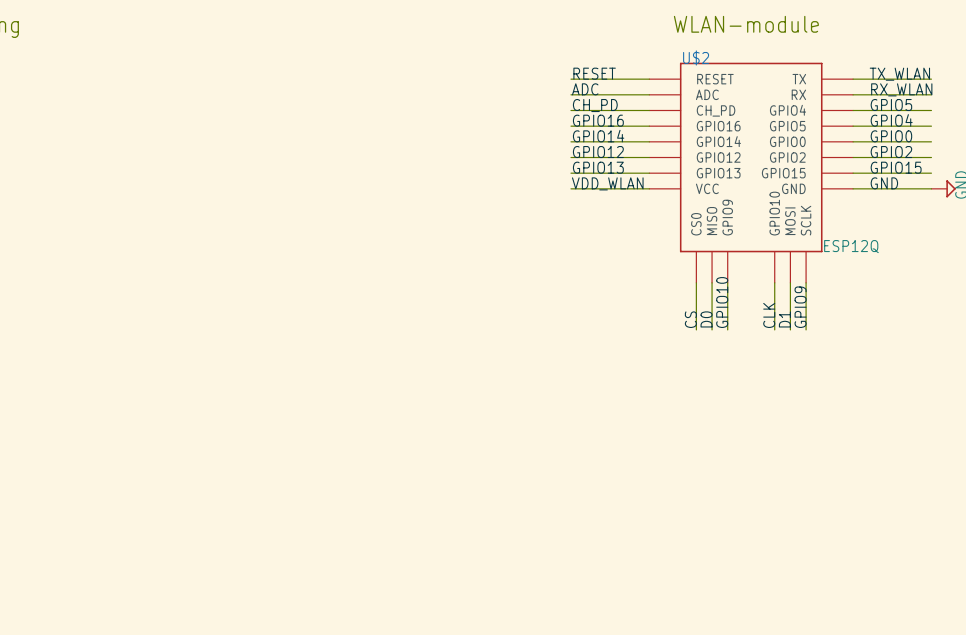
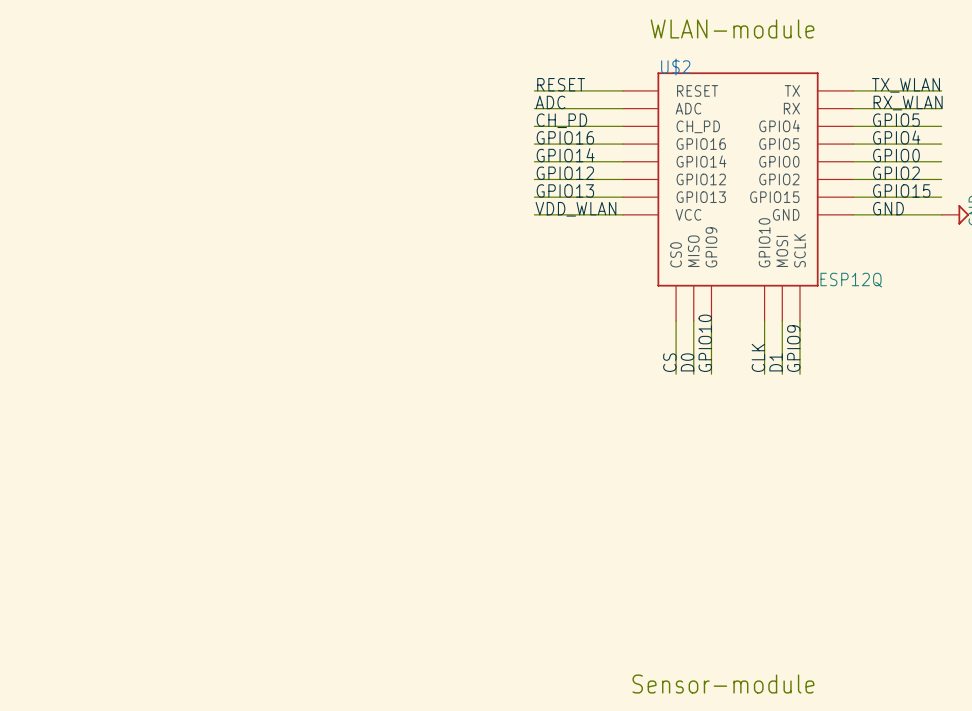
text: none -> Sensor-module (723, 684)

